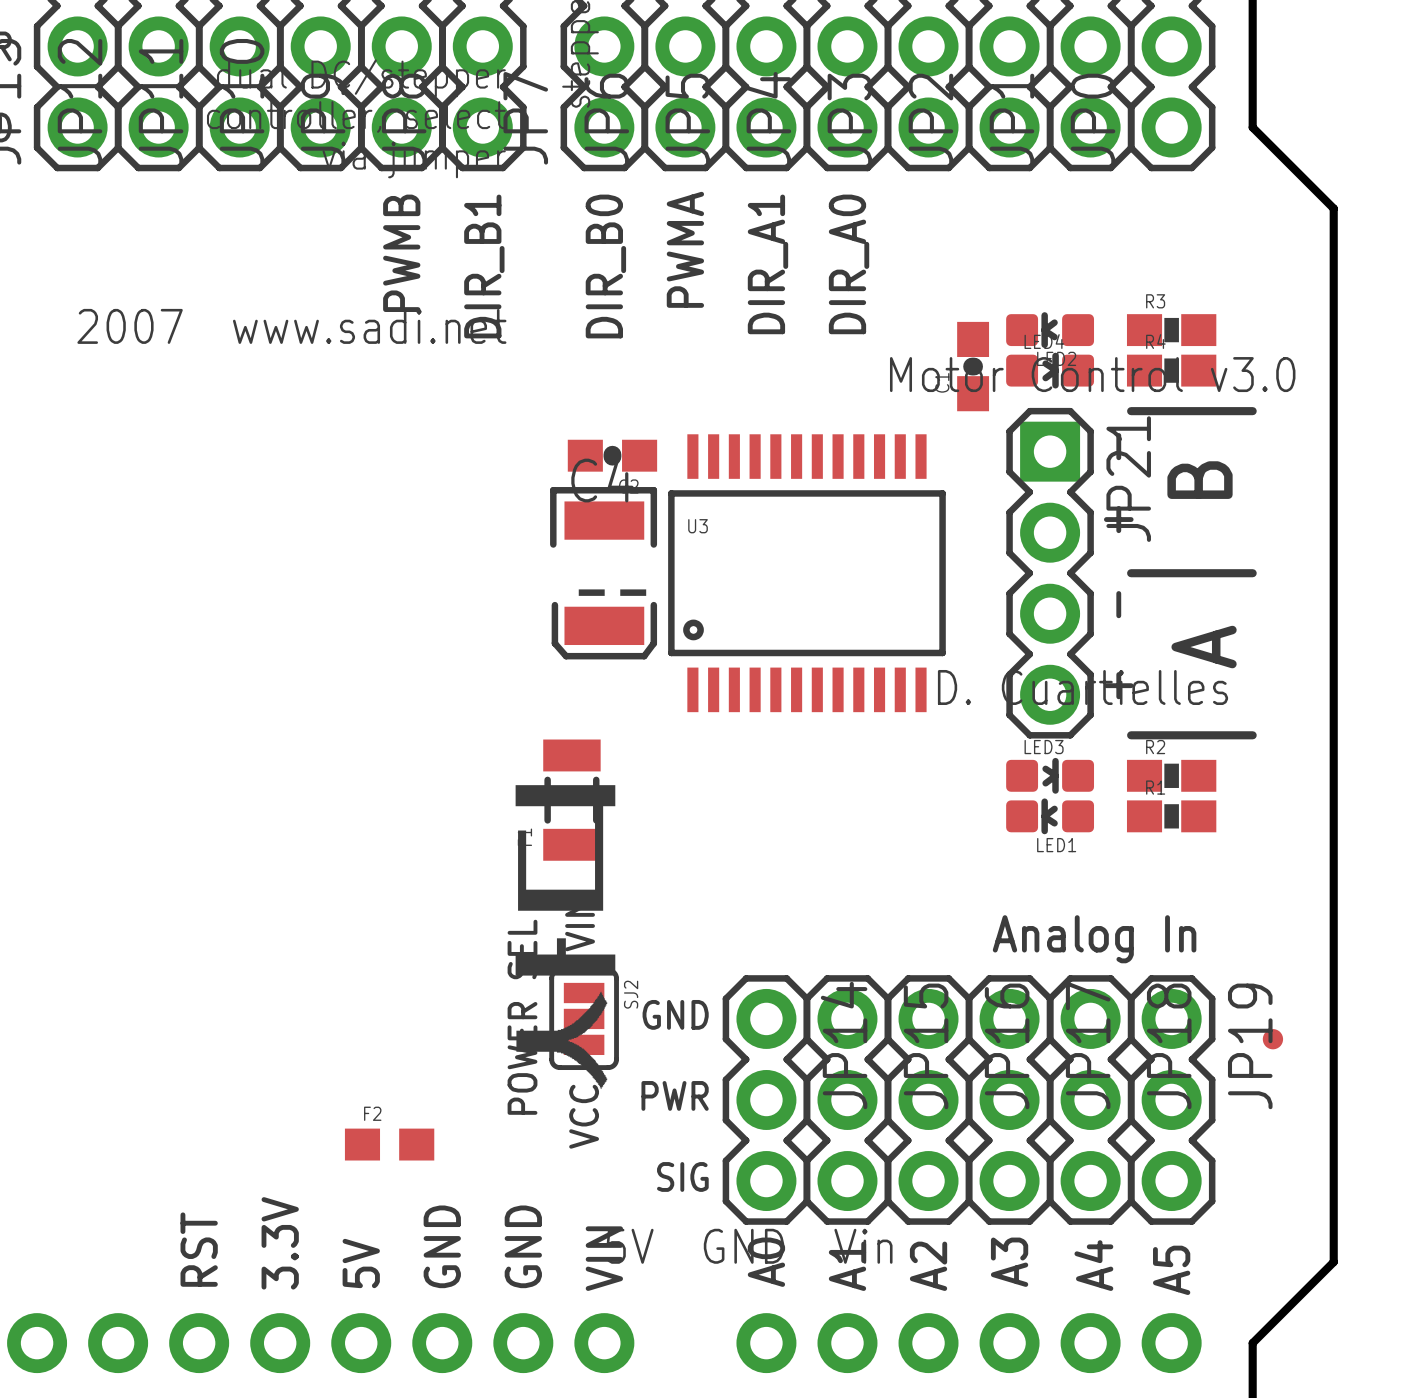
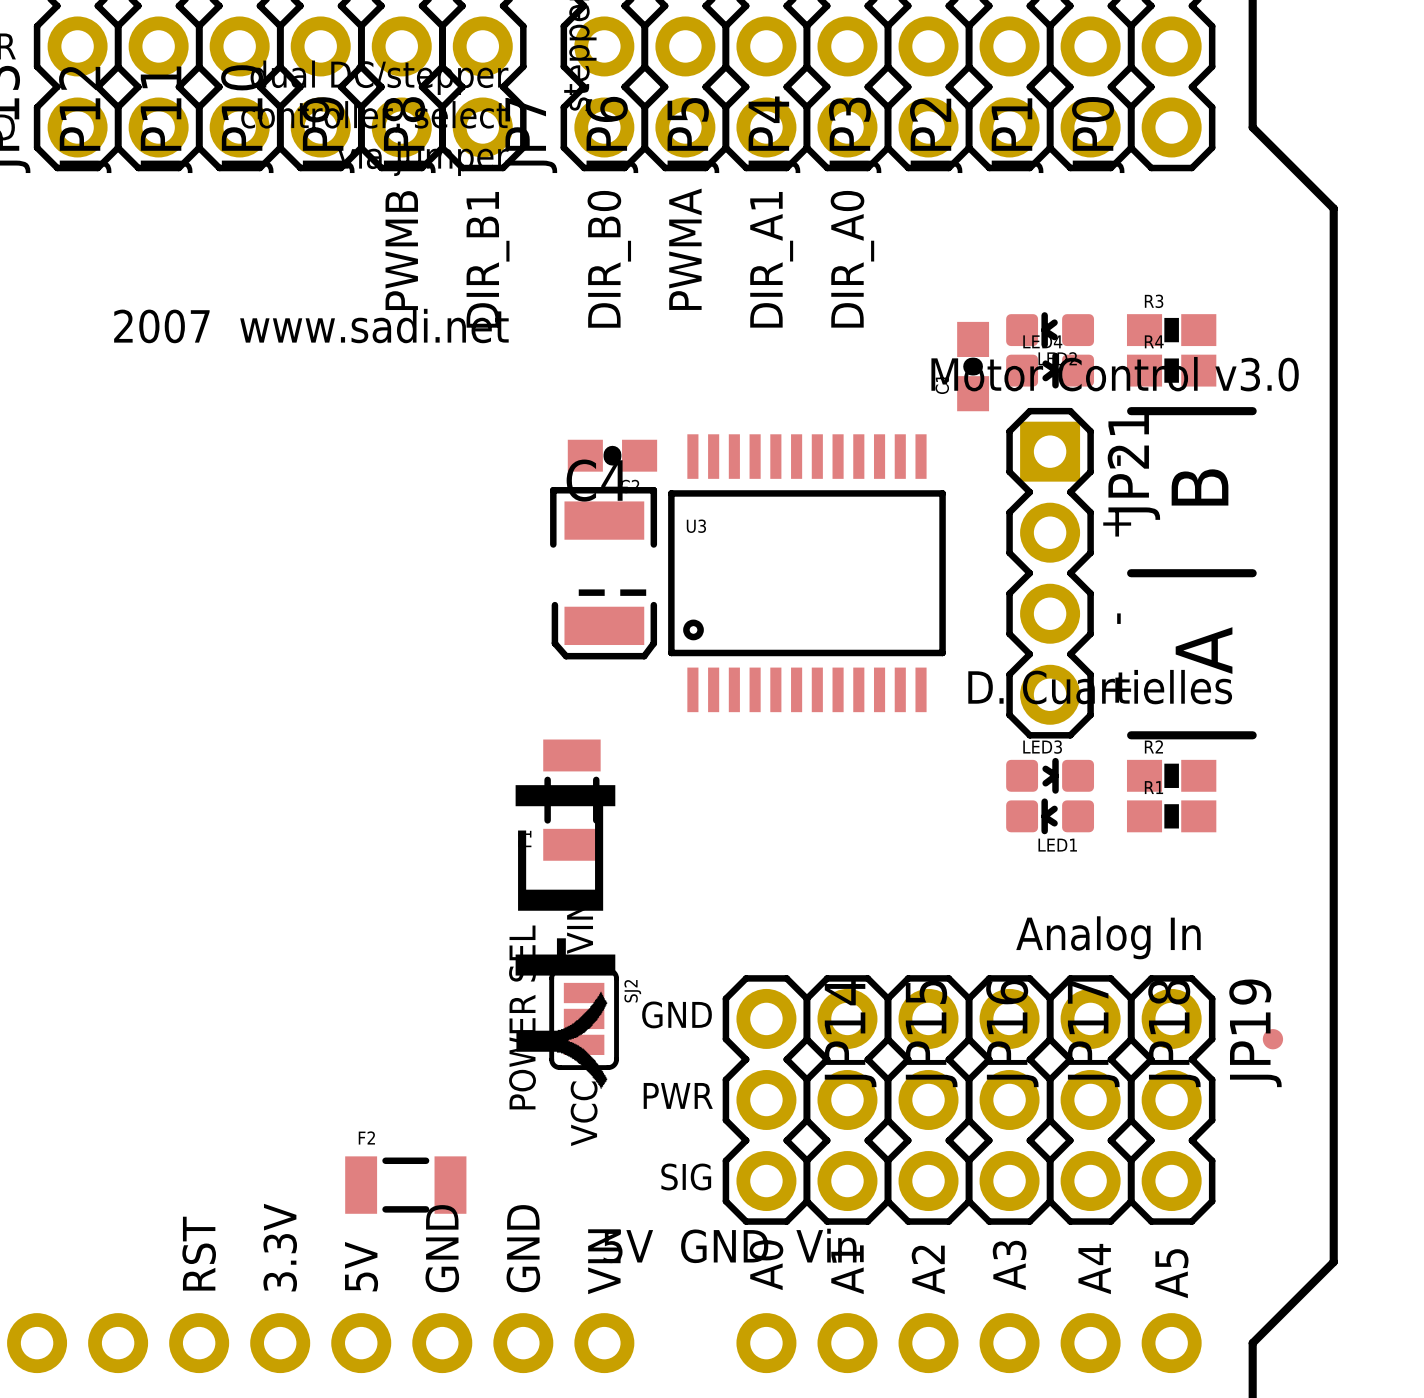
F2 footprint: [344, 1128, 435, 1161] -> [345, 1156, 467, 1214]

